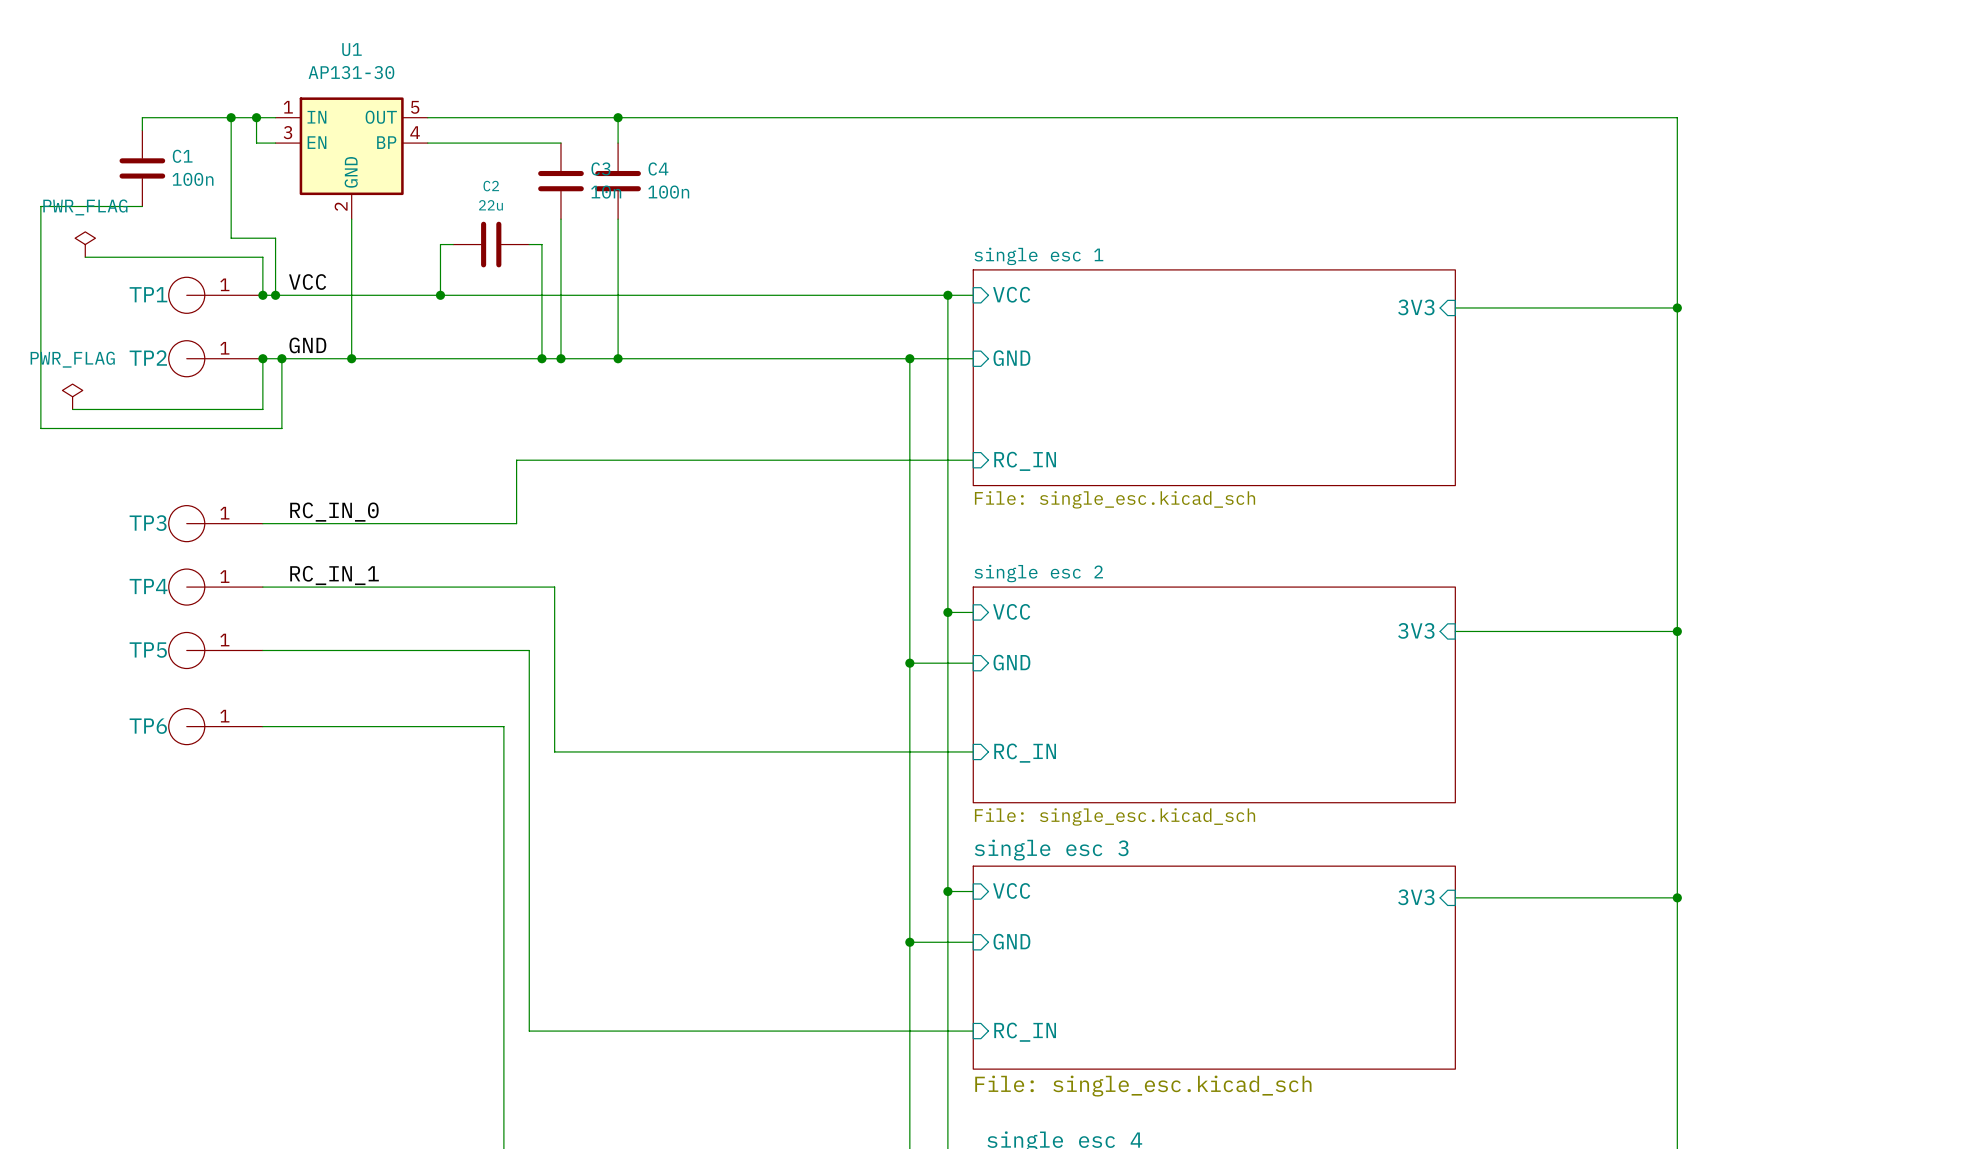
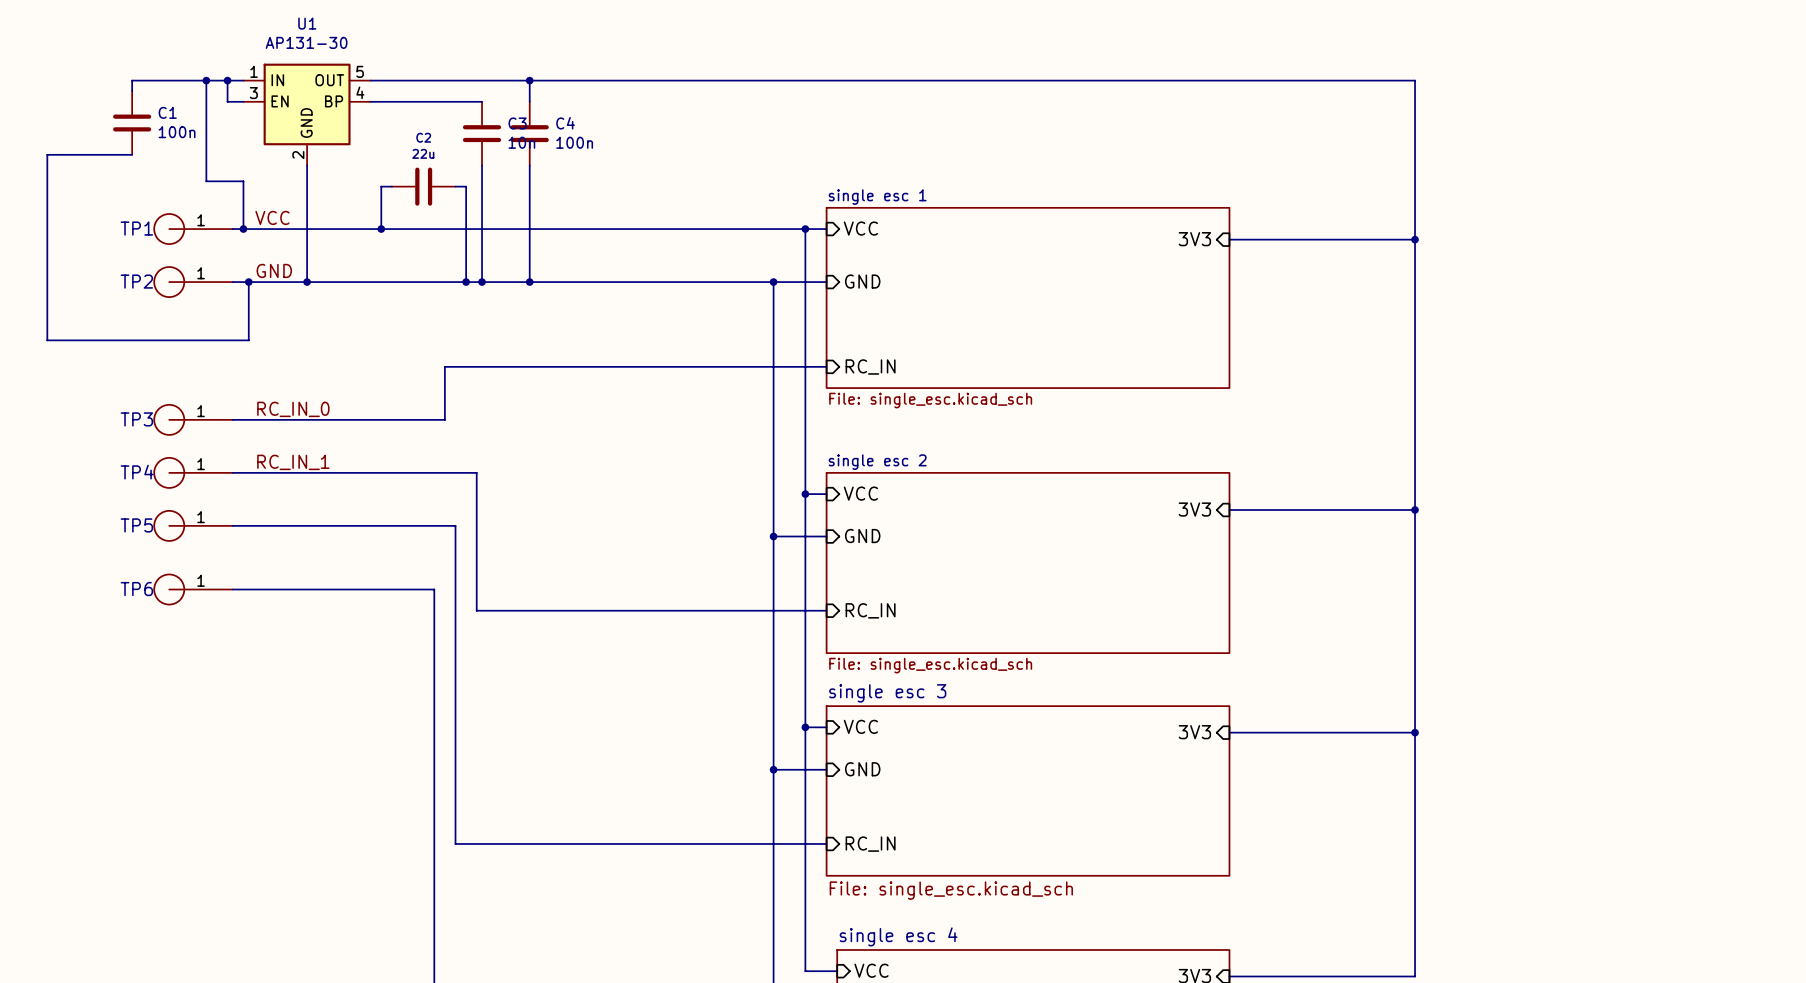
power symbol: PWR_FLAG (85, 244) -> none
wire: (85, 257) (262, 257) (262, 295) -> none
junction: (262, 295) -> none
wire: (262, 358) (262, 409) (72, 409) -> none
junction: (262, 358) -> none
power symbol: PWR_FLAG (72, 396) -> none

